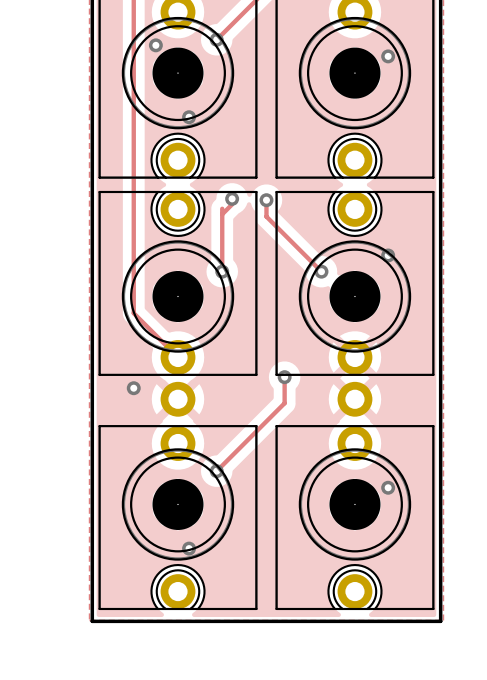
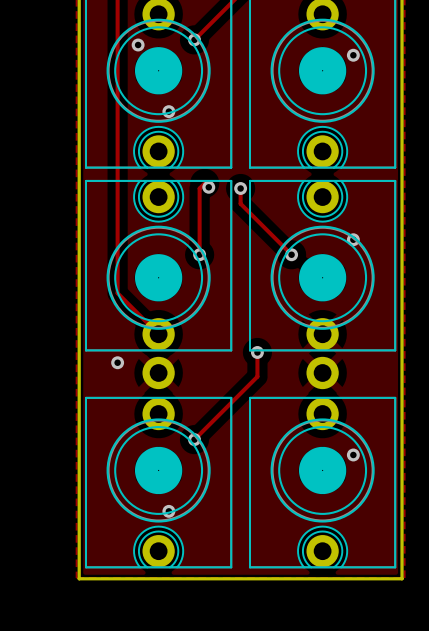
track: none -> (204, 183) (199, 188) (199, 196)
track: (232, 204) (222, 214) -> none

